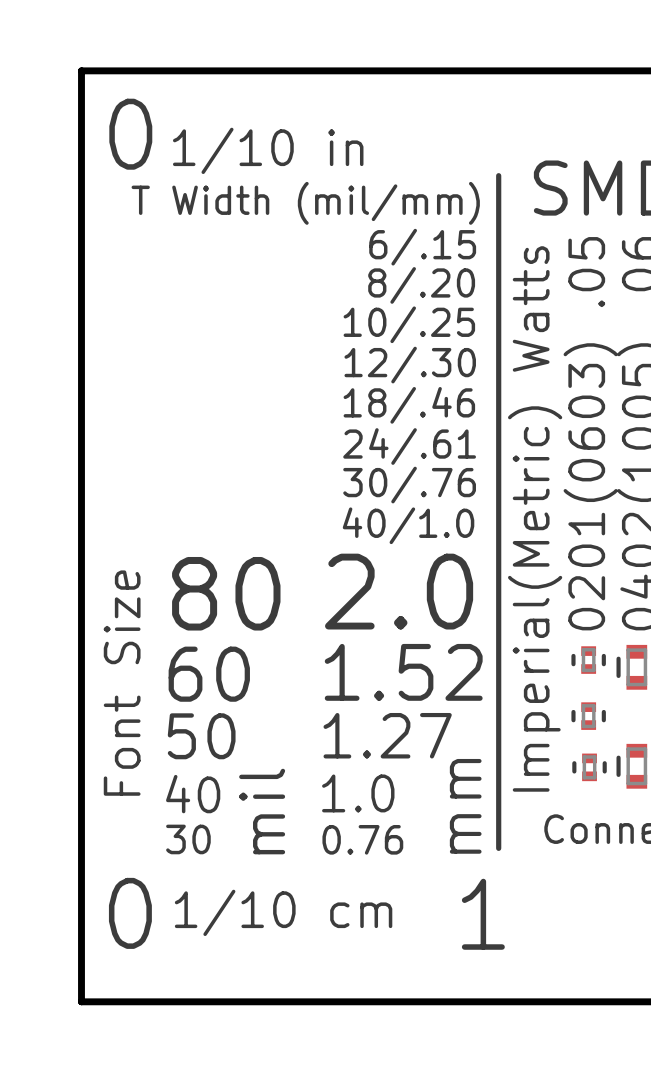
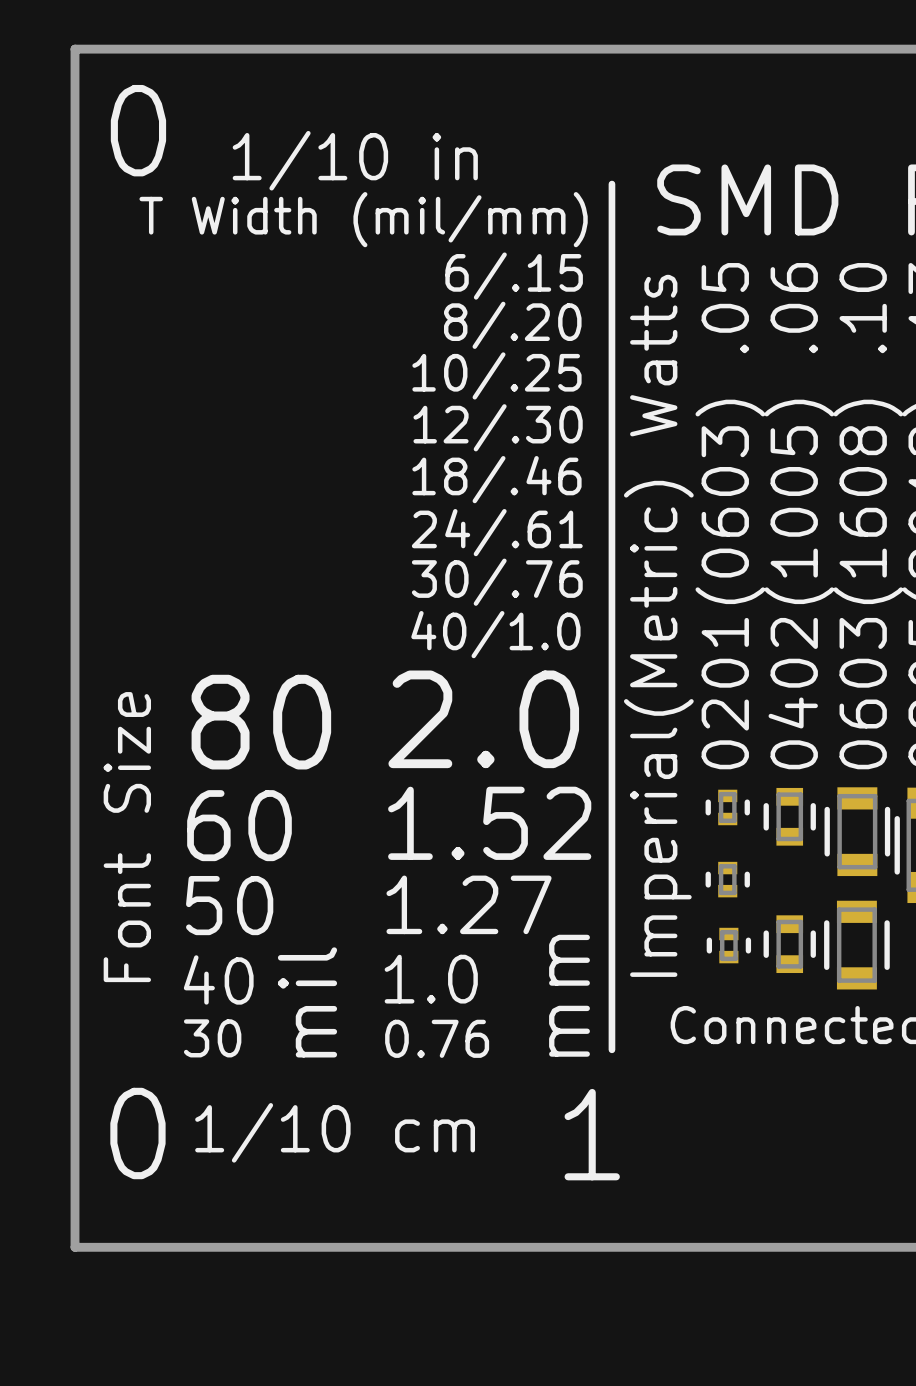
text position: 1/10 in (268, 150) -> 1/10 in (355, 160)

